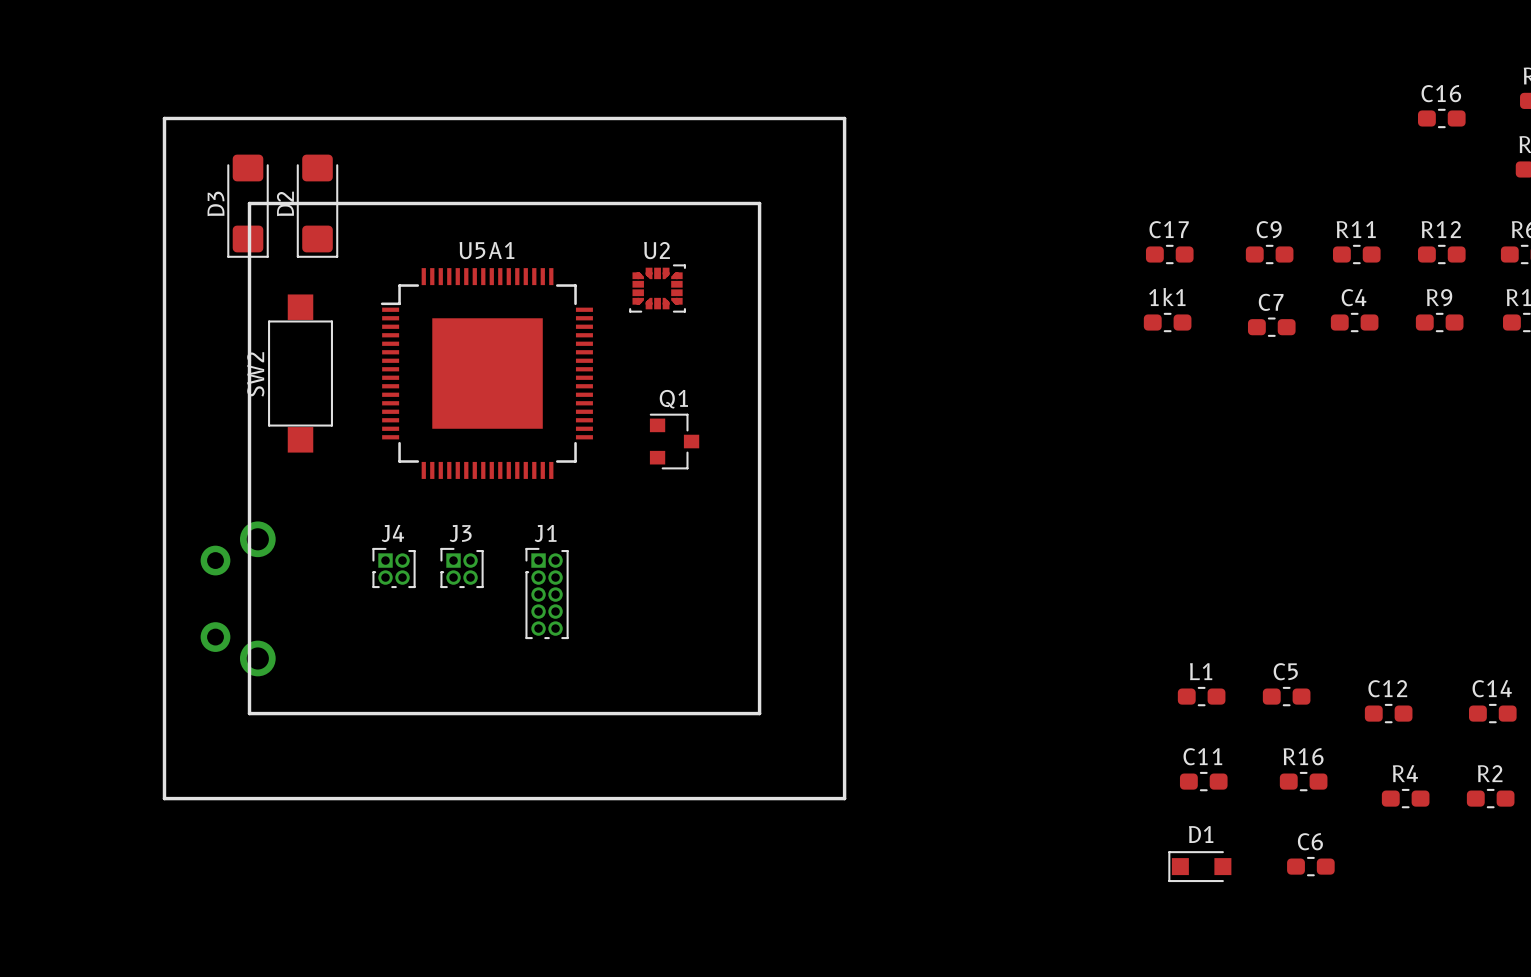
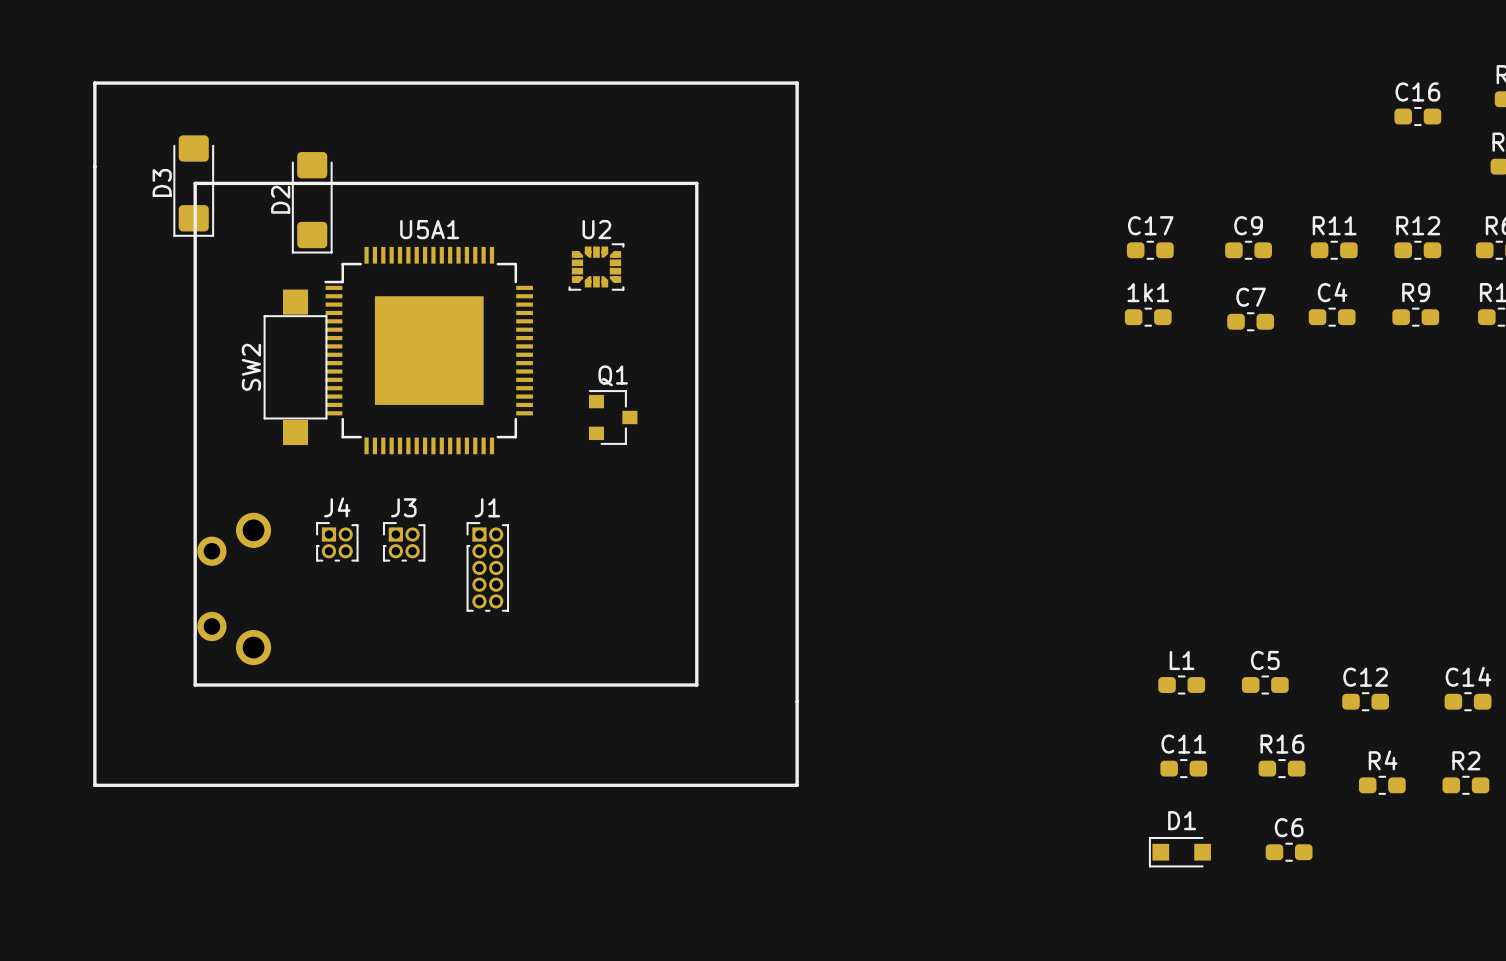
line: (249, 203) (249, 713) (759, 713) (759, 203) (249, 203) -> (195, 183) (195, 685) (696, 685) (696, 183) (195, 183)
D3 position: (248, 206) -> (193, 186)
U2 position: (657, 288) -> (596, 266)
U5A1 position: (486, 373) -> (428, 350)
Q1 position: (674, 441) -> (613, 417)
J4 position: (394, 567) -> (337, 541)
J3 position: (462, 567) -> (404, 541)
J1 position: (547, 593) -> (487, 566)
line: (164, 798) (164, 118) (844, 118) (844, 798) (810, 798) -> (161, 785) (94, 785) (94, 83) (797, 83) (797, 785)

